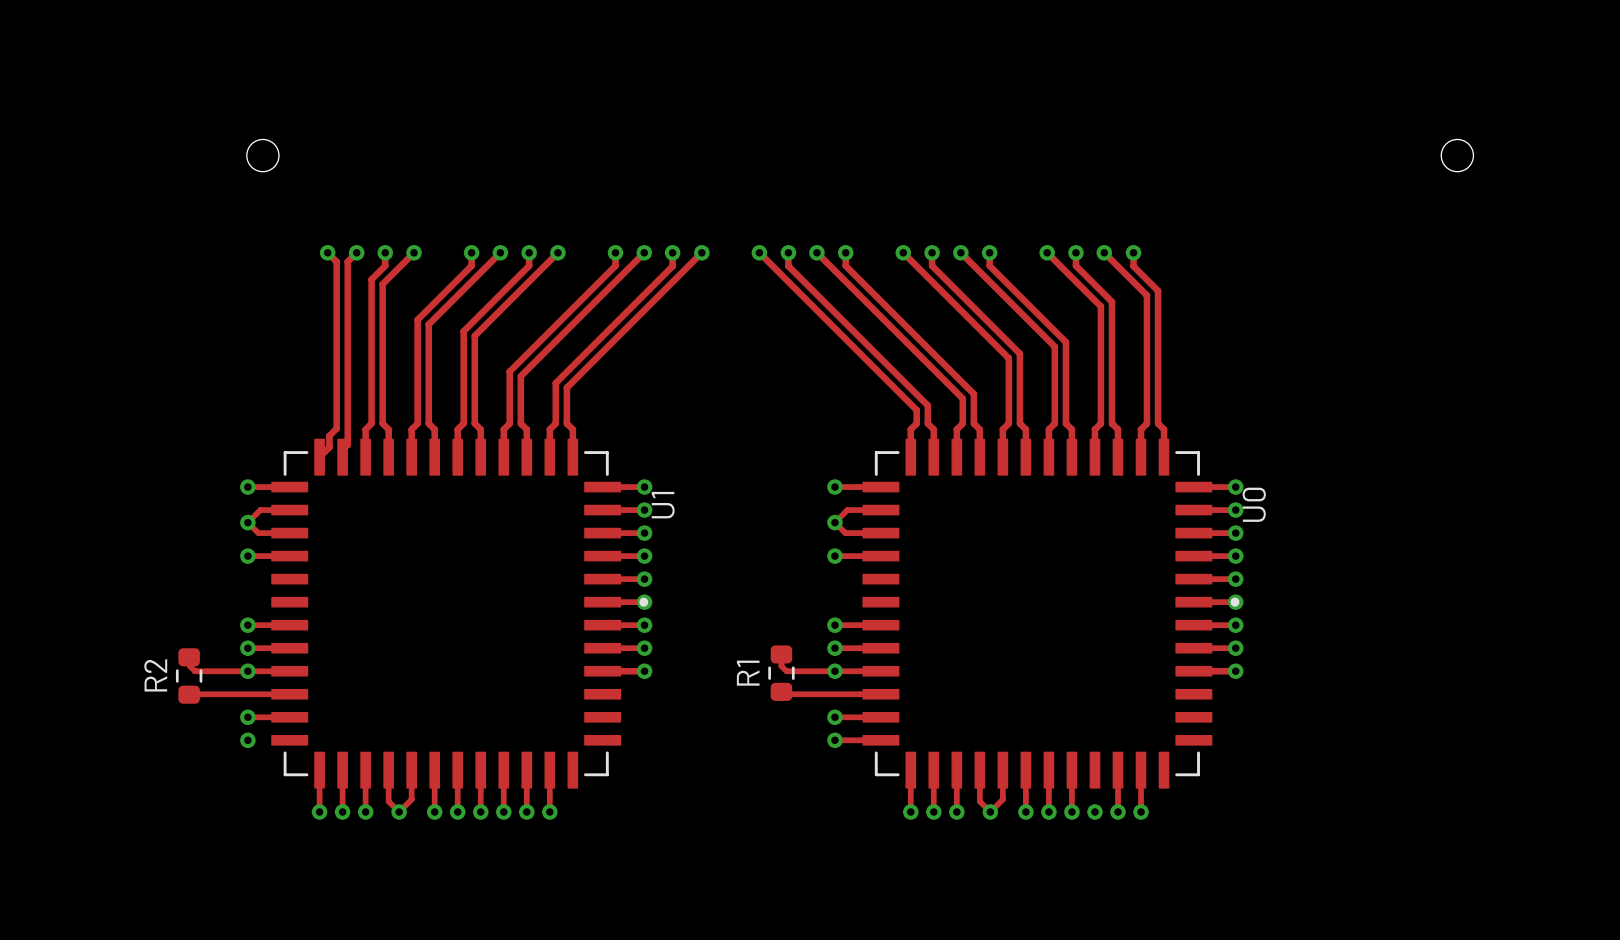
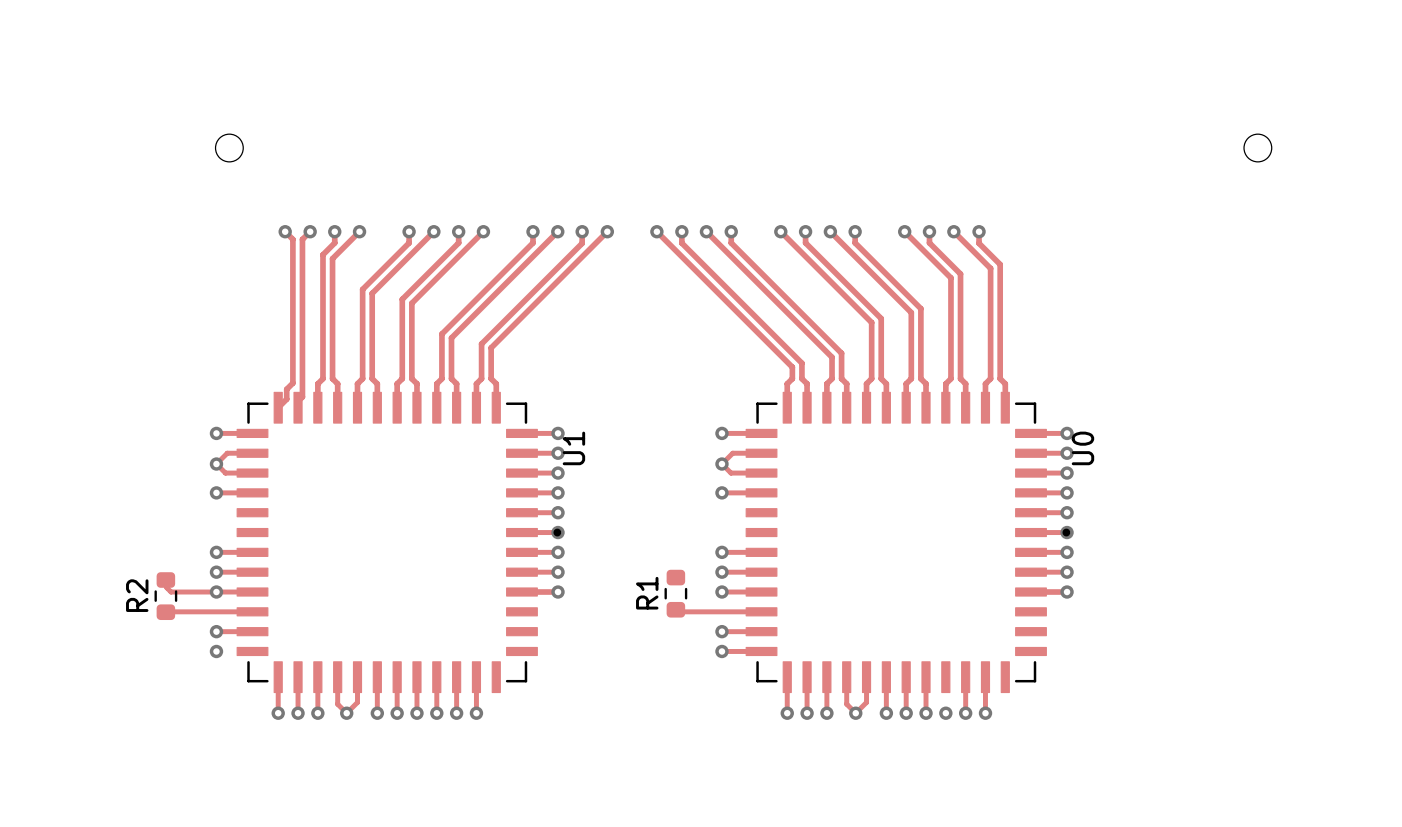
track: (781, 654) (781, 666) (786, 671) (834, 671) -> none

